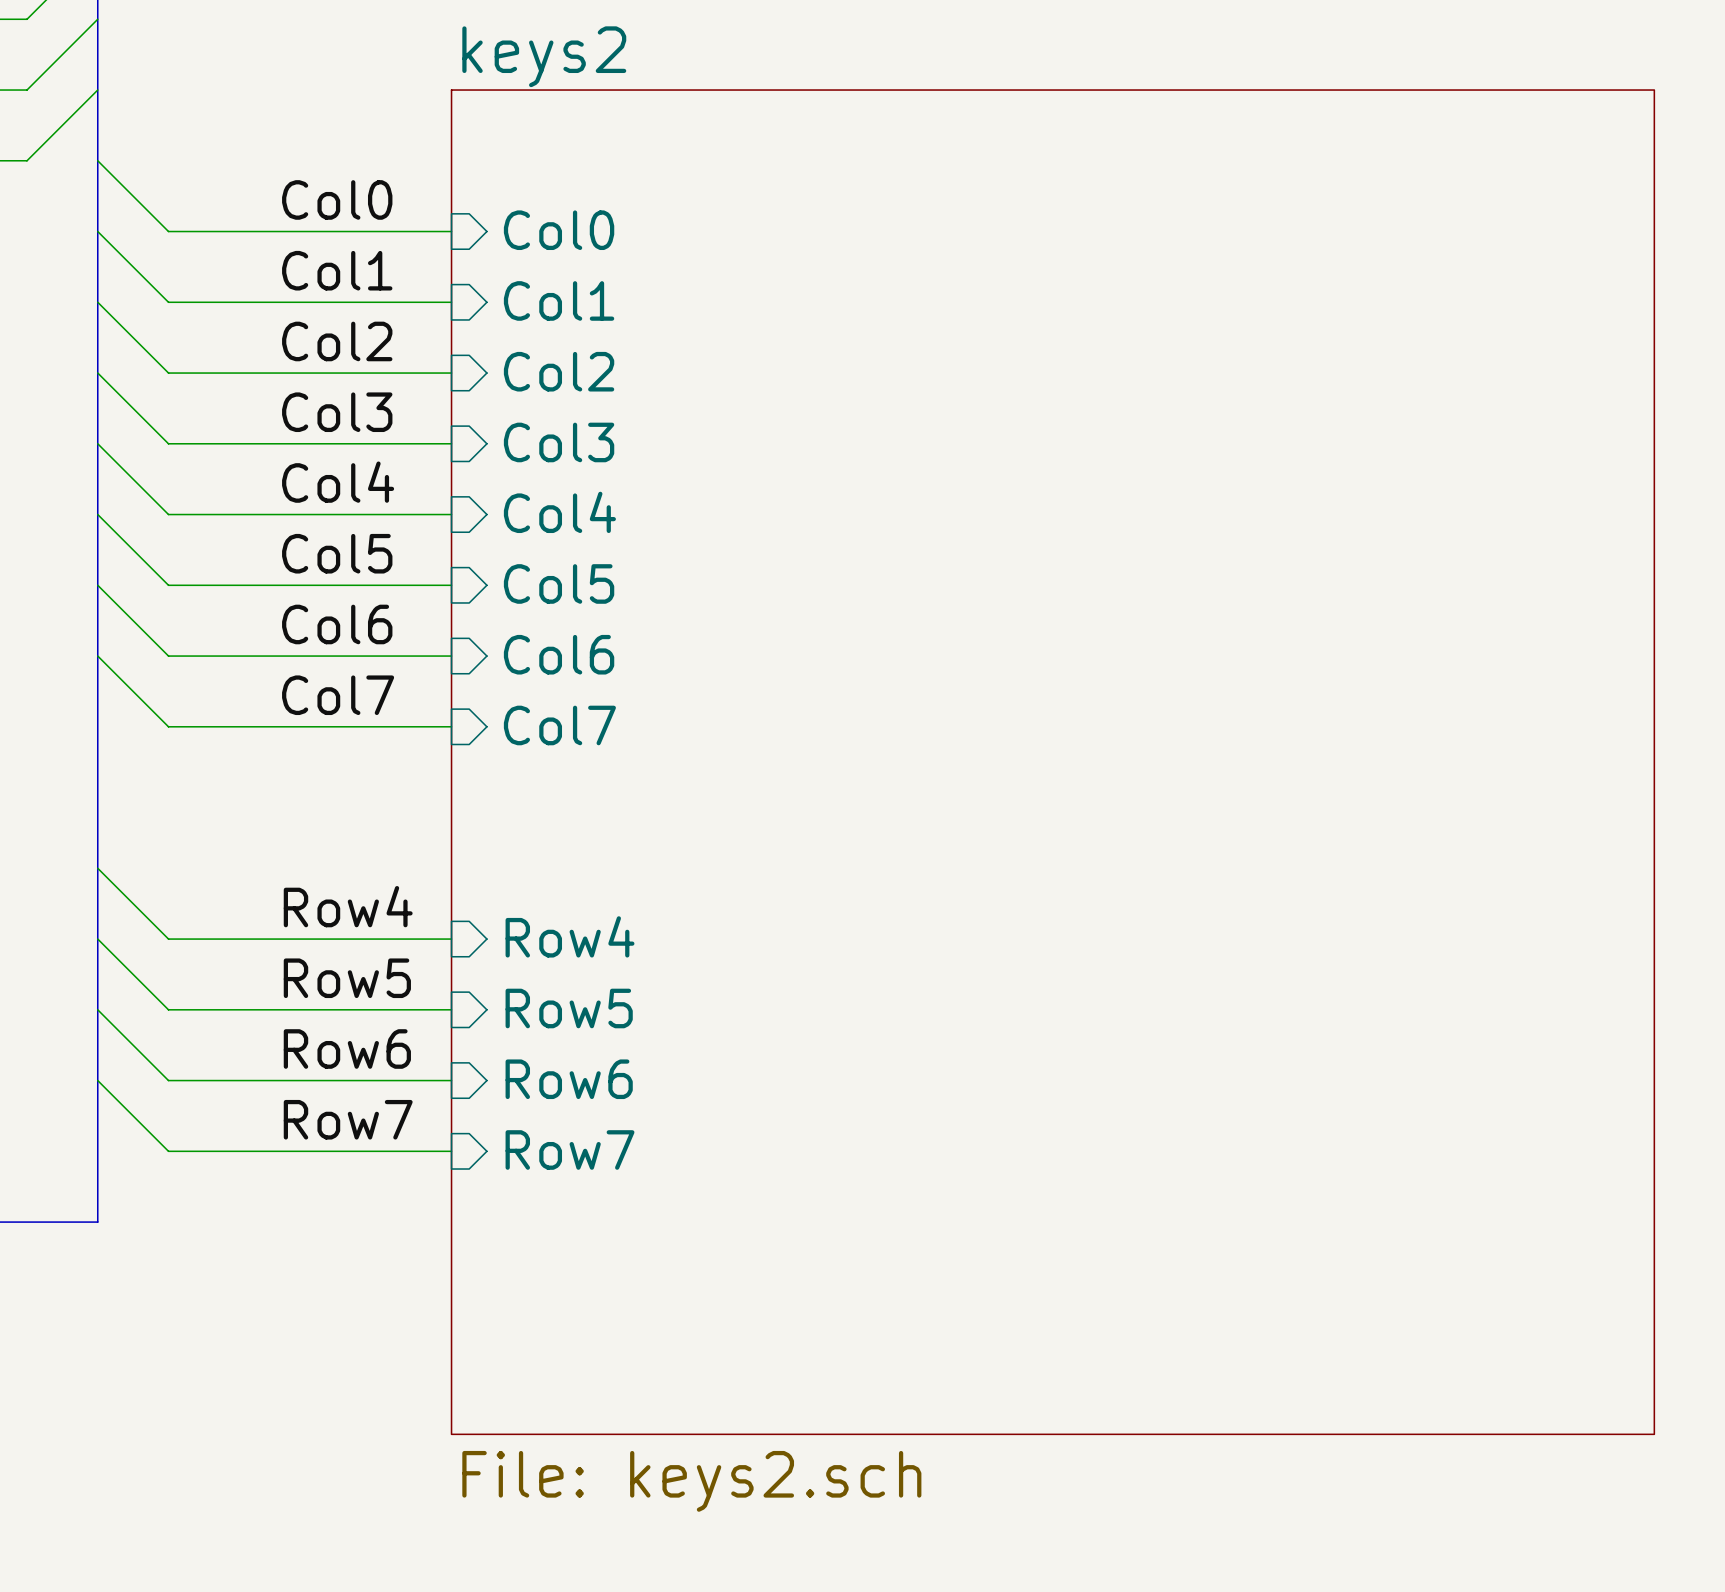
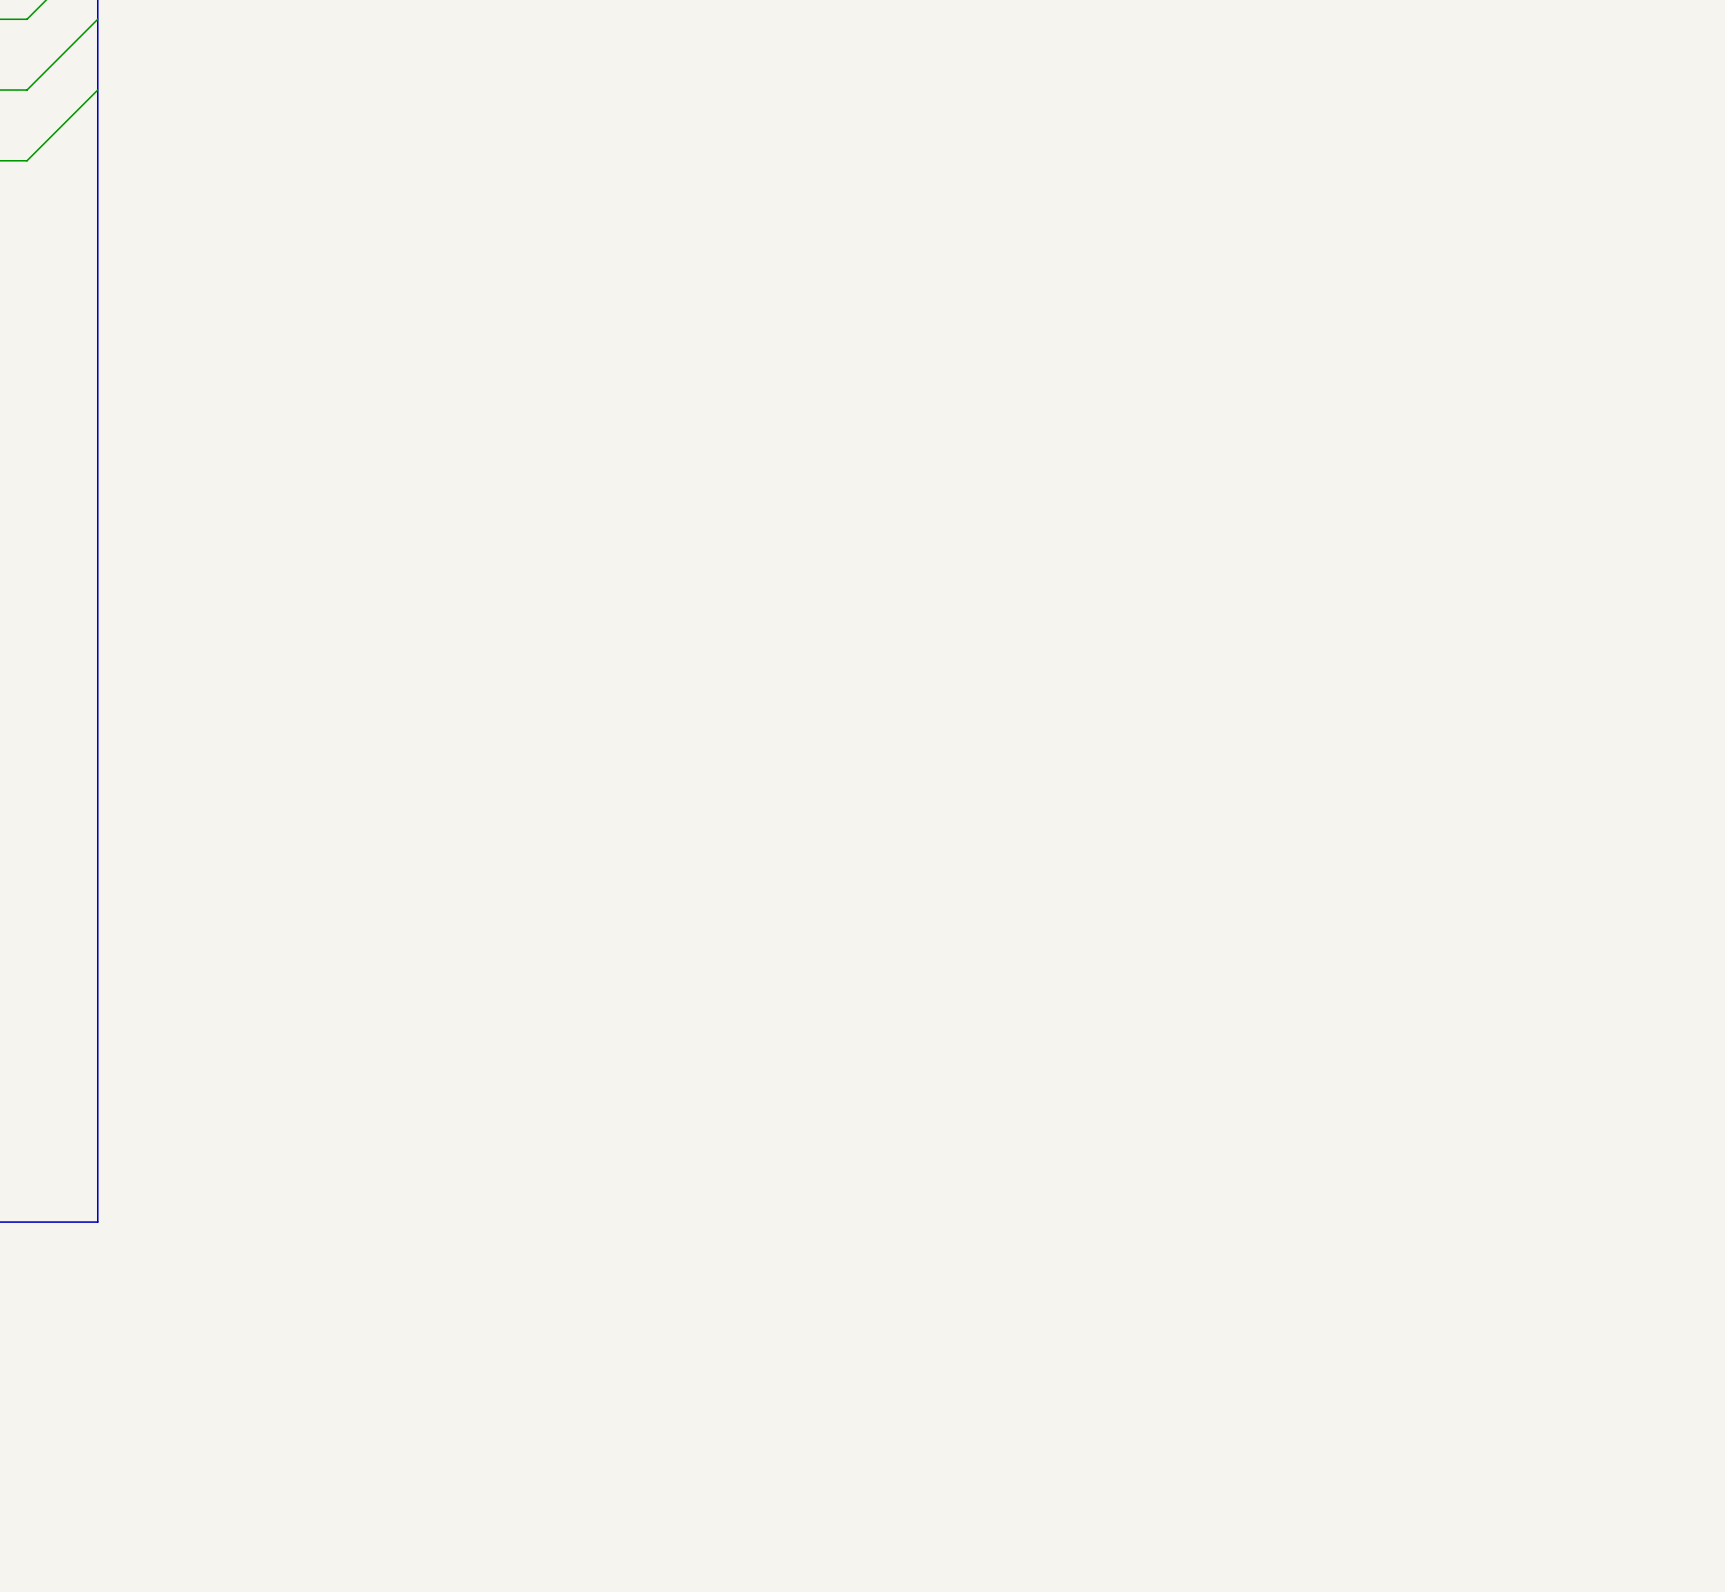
wire: (97, 160) (168, 231) (451, 231) -> none
label: Col0 (337, 199) -> none
sheet pin: Col0 (559, 230) -> none
wire: (97, 231) (168, 302) (451, 302) -> none
label: Col1 (337, 270) -> none
sheet pin: Col1 (559, 300) -> none
wire: (97, 302) (168, 373) (451, 373) -> none
label: Col2 (337, 341) -> none
sheet pin: Col2 (559, 371) -> none
wire: (97, 373) (168, 443) (451, 443) -> none
label: Col3 (337, 412) -> none
sheet pin: Col3 (559, 442) -> none
wire: (97, 443) (168, 514) (451, 514) -> none
label: Col4 (338, 482) -> none
sheet pin: Col4 (559, 512) -> none
wire: (97, 514) (168, 585) (451, 585) -> none
label: Col5 (337, 553) -> none
sheet pin: Col5 (559, 583) -> none
wire: (97, 585) (168, 656) (451, 656) -> none
label: Col6 (337, 624) -> none
sheet pin: Col6 (559, 654) -> none
wire: (97, 656) (168, 726) (451, 726) -> none
label: Col7 (338, 695) -> none
sheet pin: Col7 (559, 725) -> none
sheet keys2: File: keys2.sch (1052, 762) -> none
wire: (97, 868) (168, 939) (451, 939) -> none
label: Row4 (348, 906) -> none
sheet pin: Row4 (570, 936) -> none
wire: (97, 939) (168, 1009) (451, 1009) -> none
label: Row5 (347, 978) -> none
sheet pin: Row5 (569, 1008) -> none
wire: (97, 1009) (168, 1080) (451, 1080) -> none
label: Row6 (347, 1048) -> none
sheet pin: Row6 (569, 1079) -> none
wire: (97, 1080) (168, 1151) (451, 1151) -> none
label: Row7 (348, 1119) -> none
sheet pin: Row7 (570, 1149) -> none

